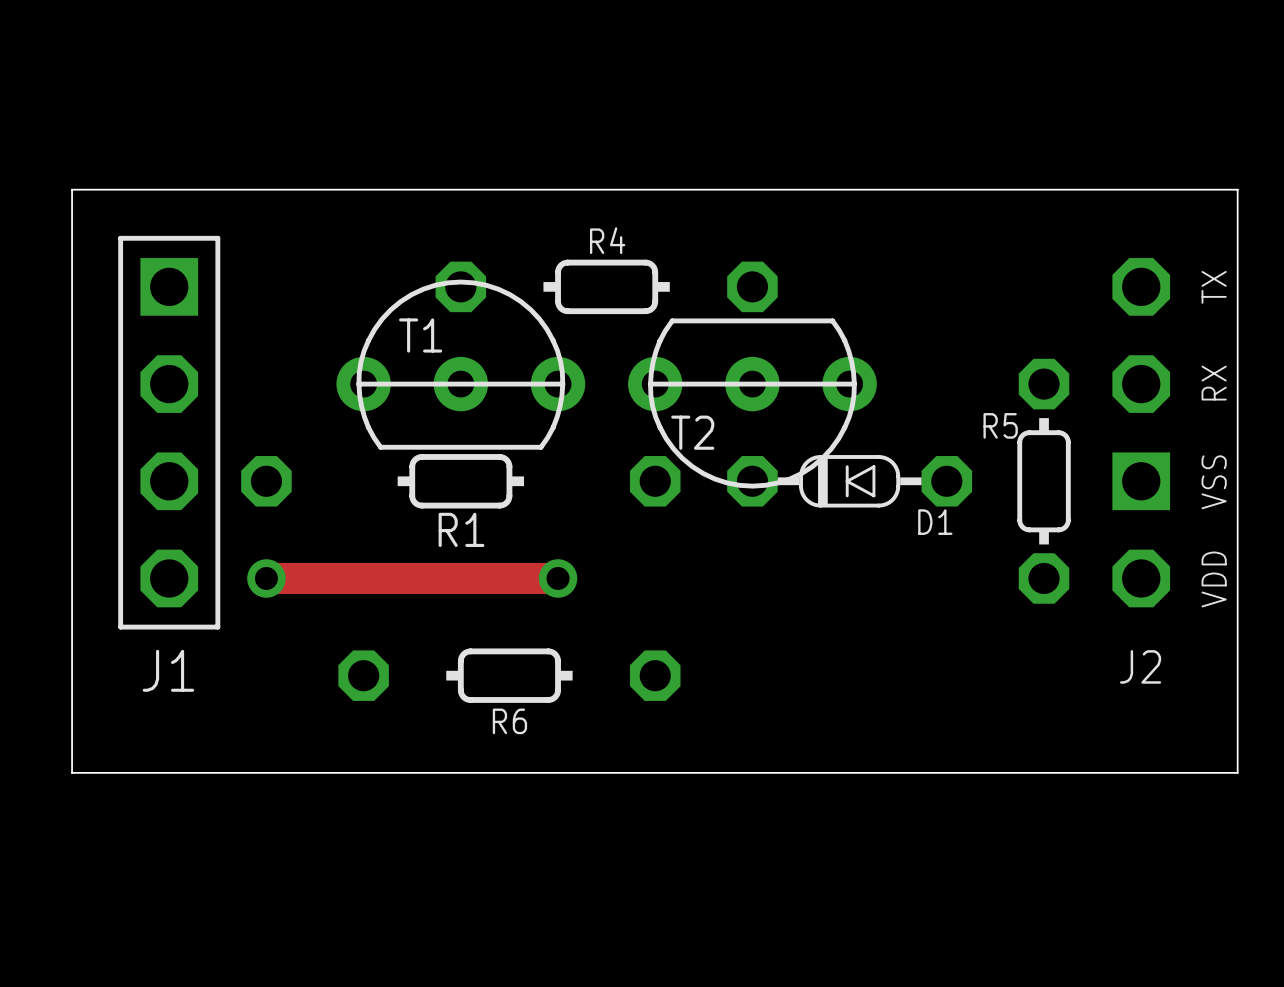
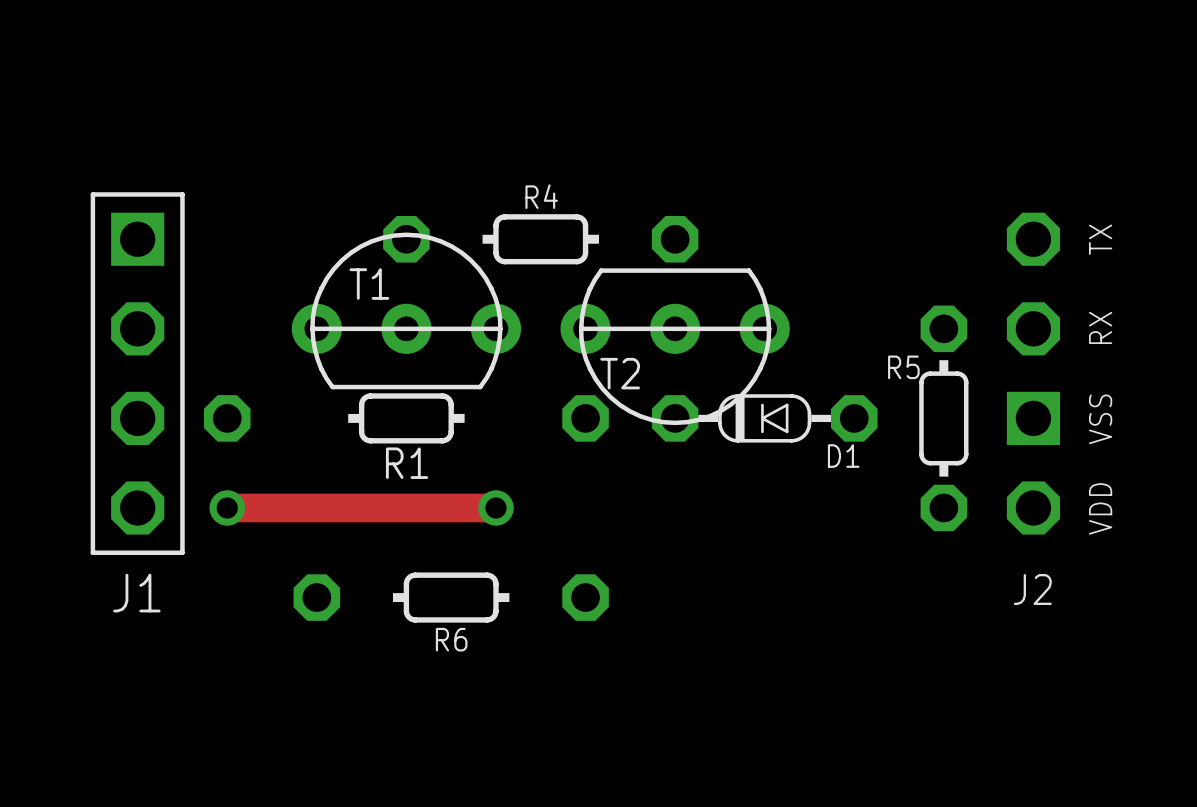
board edge: (72, 189) (1237, 189) (1237, 772) (72, 772) (72, 189) -> none

